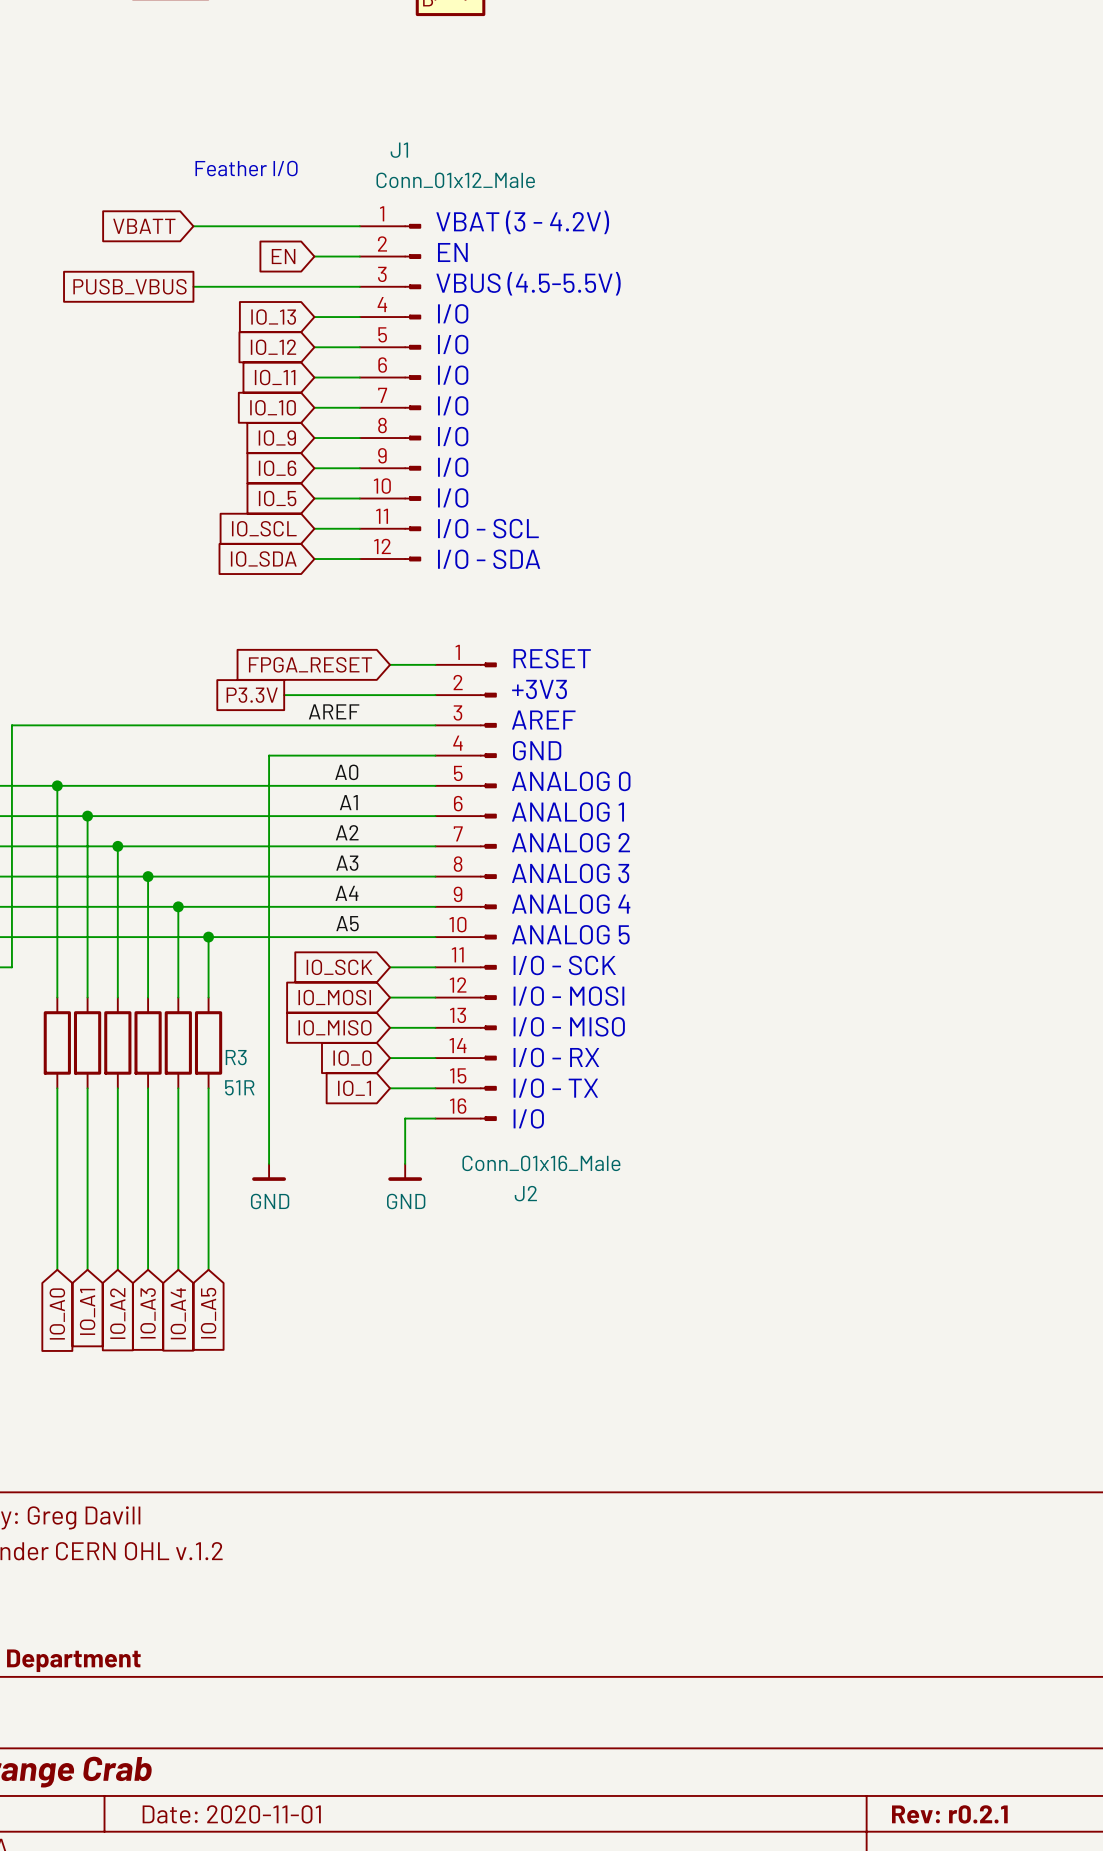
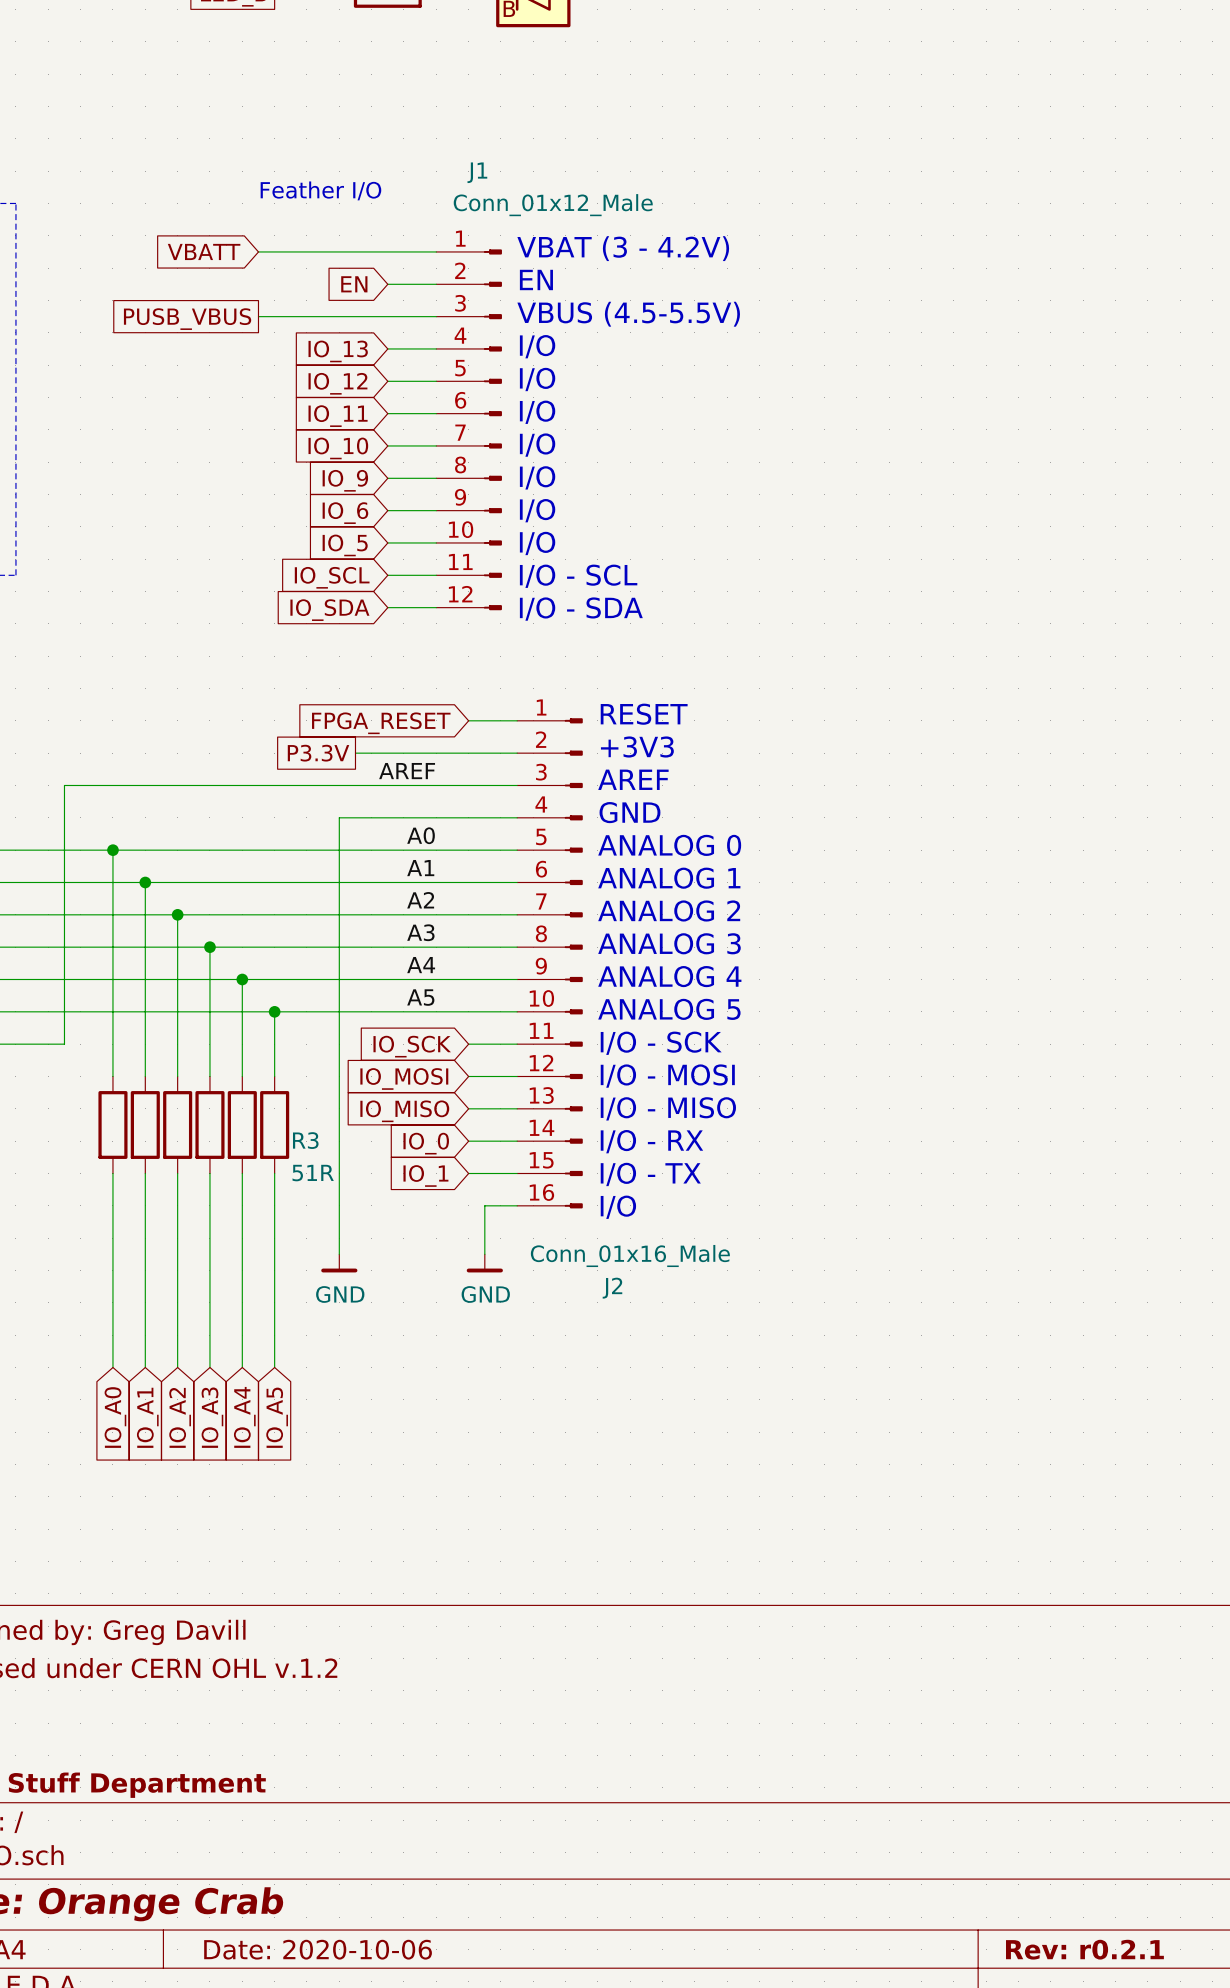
title block: Date: 2020-11-01 (231, 1814) -> Date: 2020-10-06 (318, 1949)

